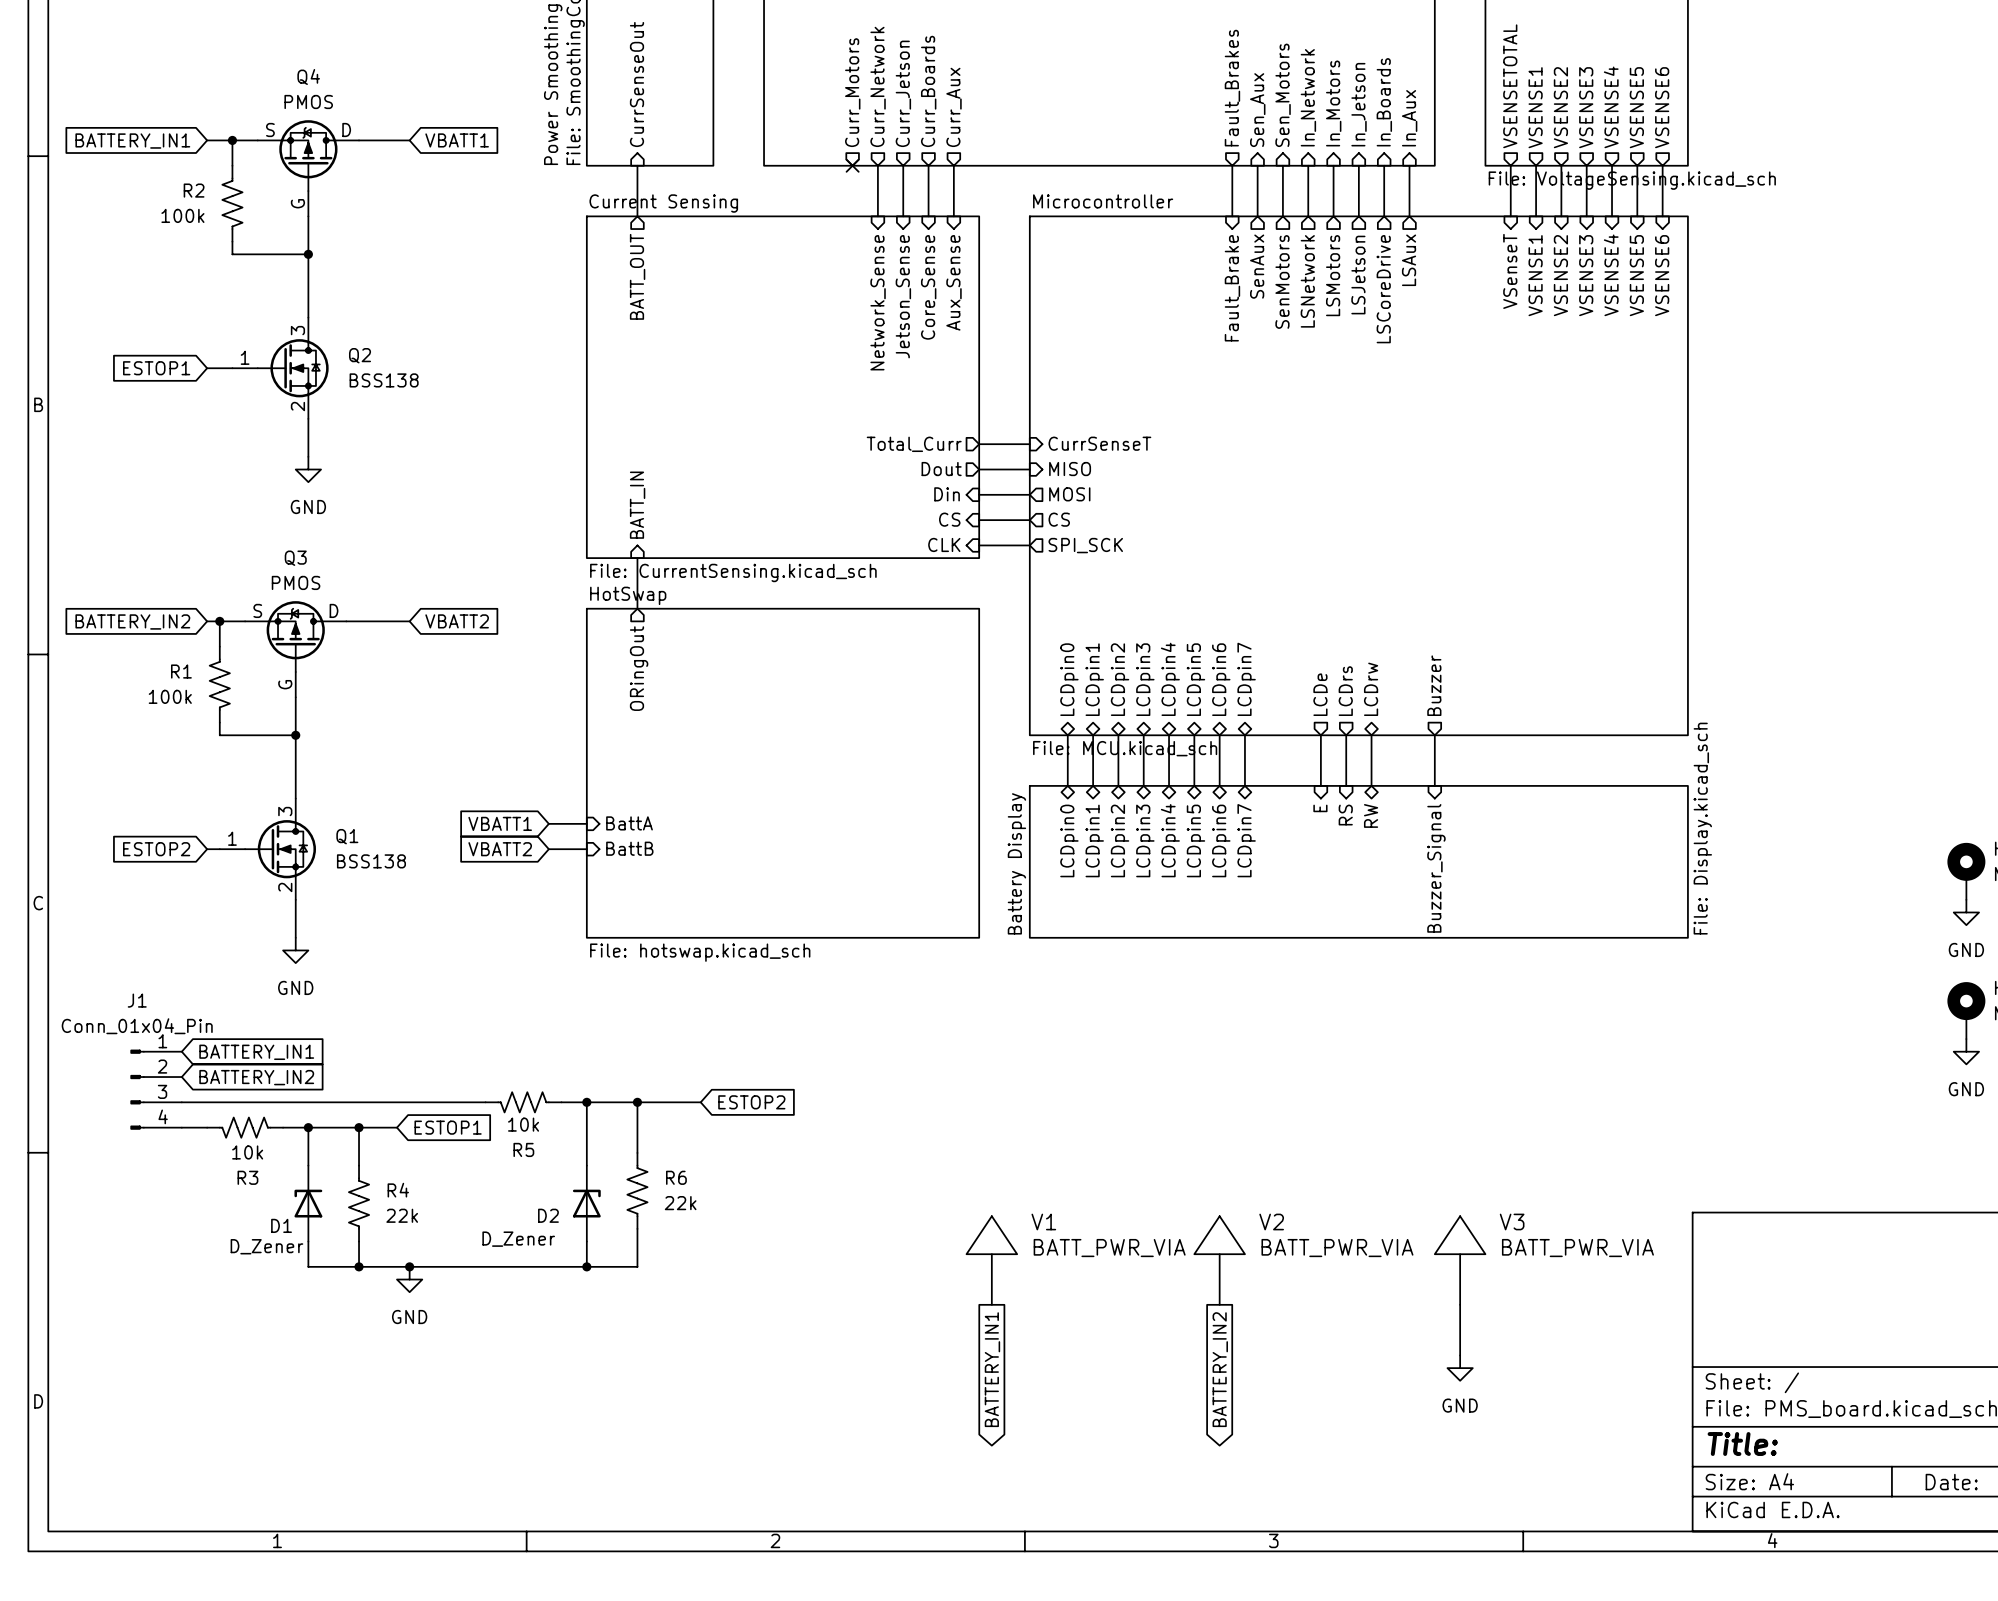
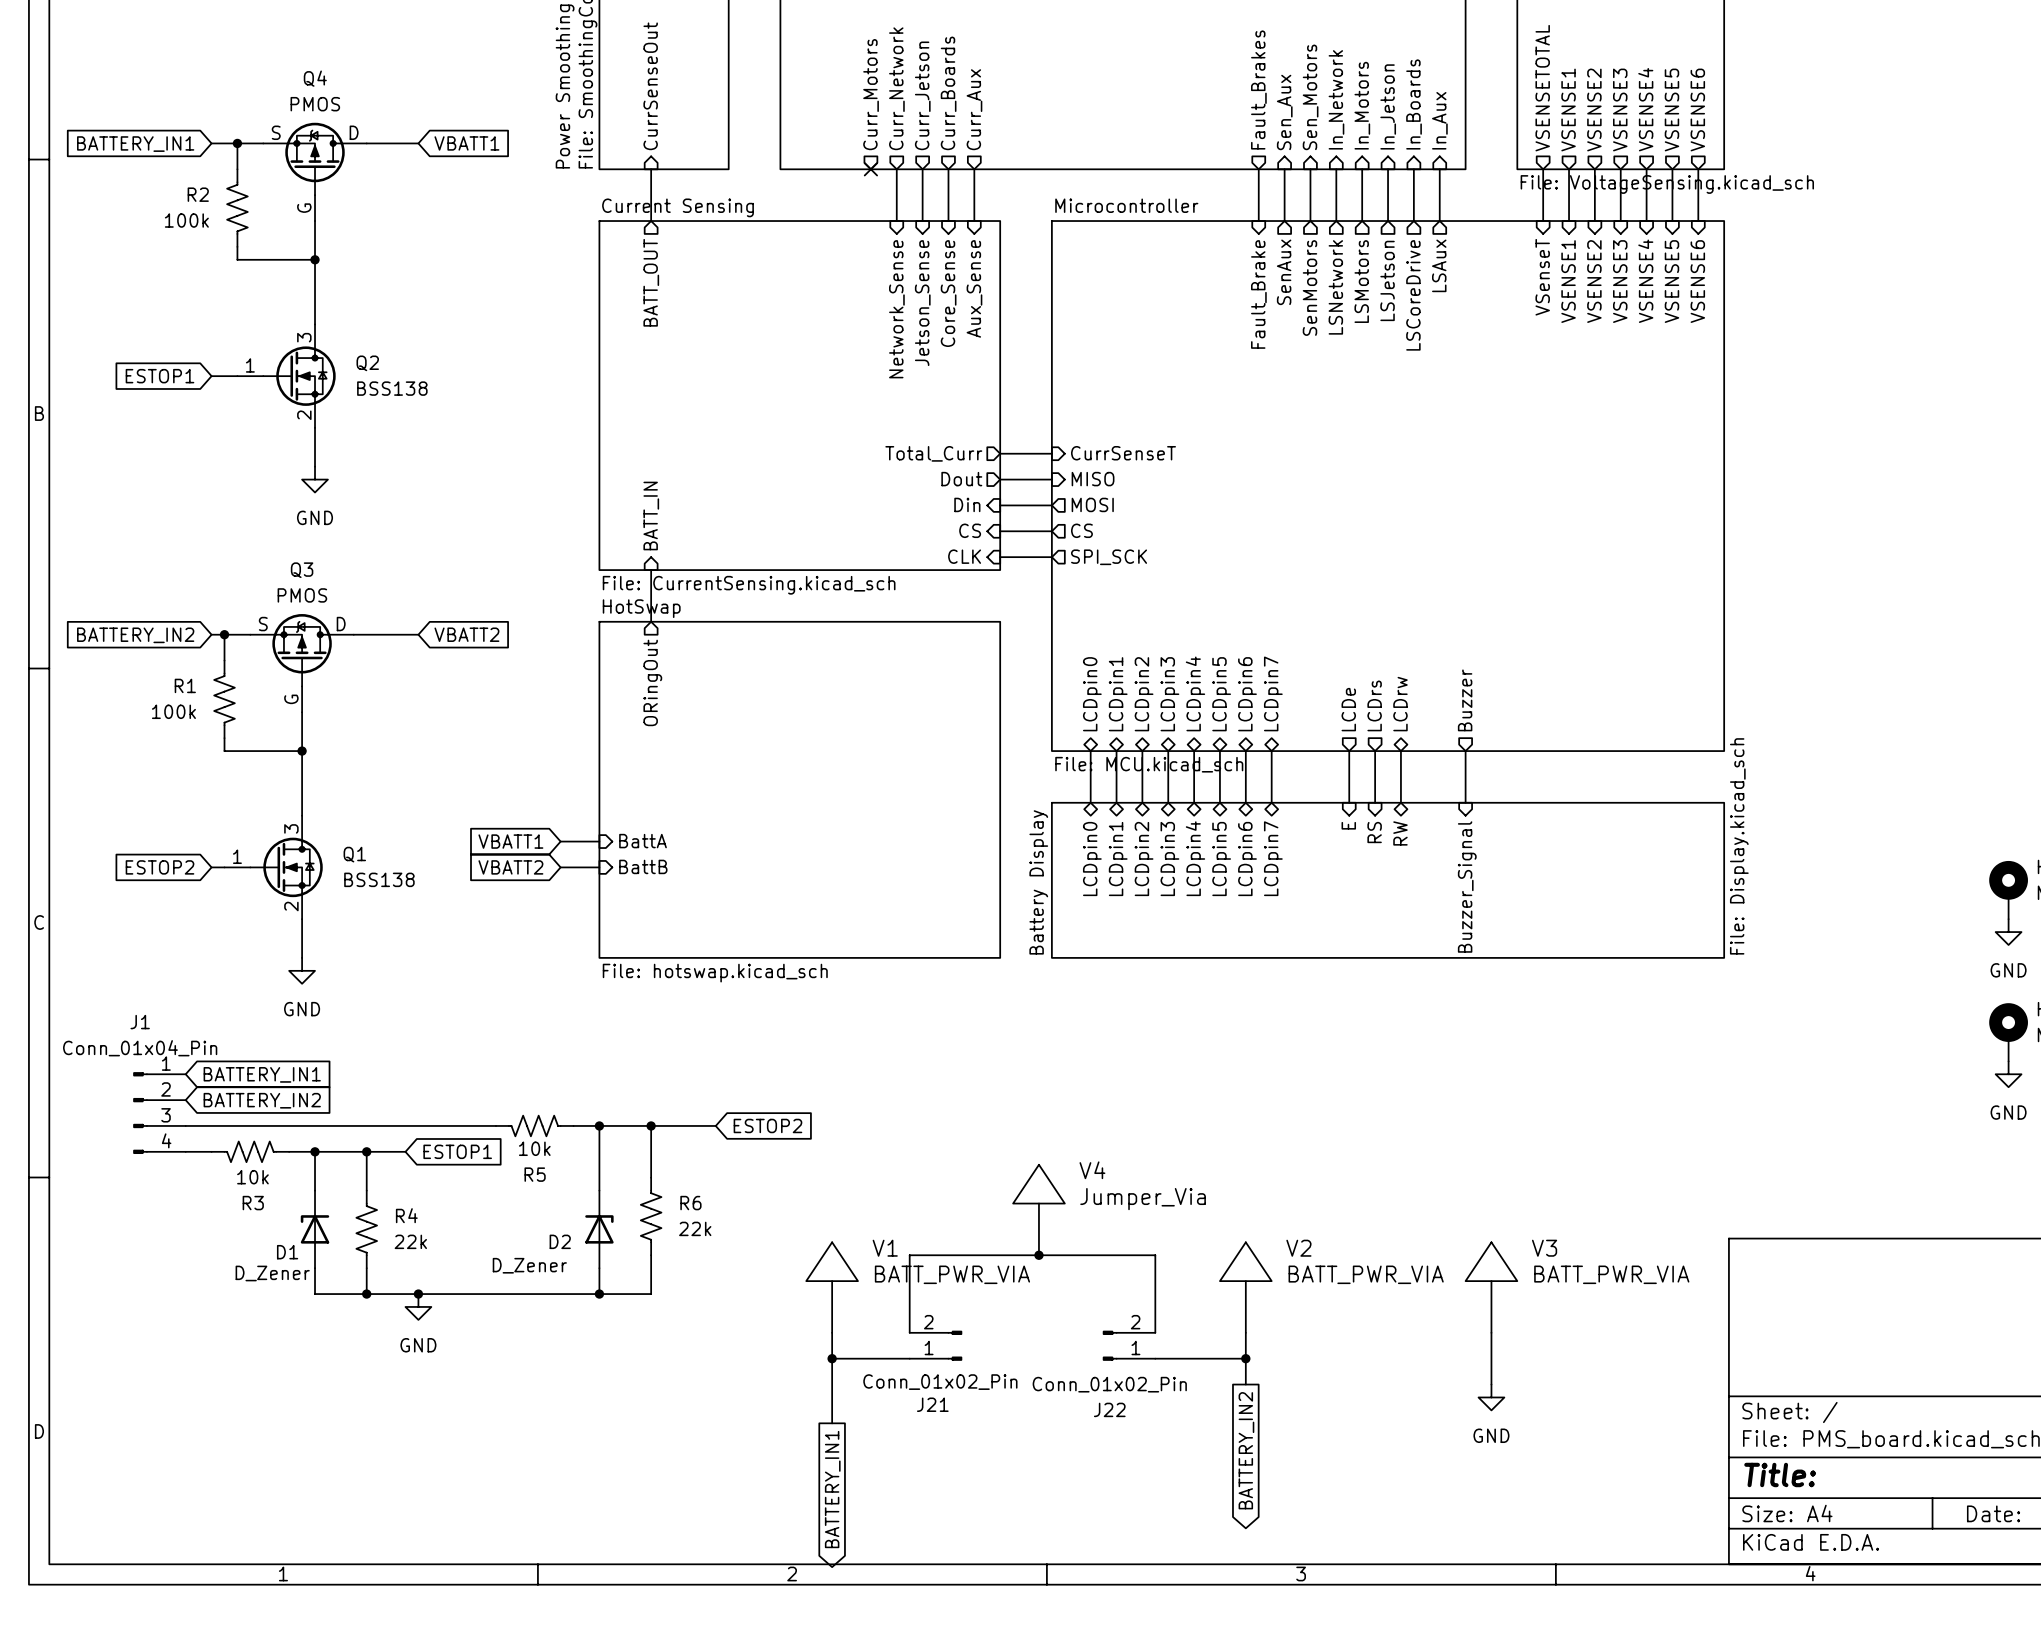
V4: none -> Jumper_Via (1038, 1210)
junction: none -> (1038, 1255)
V1 position: (991, 1260) -> (832, 1287)
wire: none -> (832, 1332) (832, 1423)
wire: none -> (909, 1332) (909, 1255) (1155, 1255) (1155, 1332)
wire: none -> (1245, 1332) (1245, 1384)
J21: none -> Conn_01x02_Pin (935, 1345)
J22: none -> Conn_01x02_Pin (1129, 1345)
wire: none -> (832, 1358) (909, 1358)
junction: none -> (832, 1358)
wire: none -> (1155, 1358) (1245, 1358)
junction: none -> (1245, 1358)
global label position: BATTERY_IN1 (992, 1369) -> BATTERY_IN1 (832, 1489)
global label position: BATTERY_IN2 (1220, 1369) -> BATTERY_IN2 (1246, 1450)

